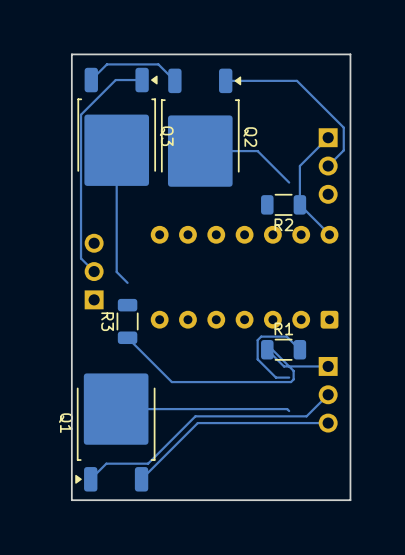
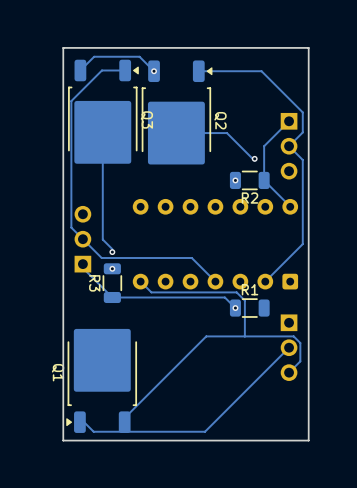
via: none -> (154, 71)
track: none -> (289, 146) (302, 159) (302, 244) (265, 281)
via: none -> (254, 158)
via: none -> (235, 180)
track: none -> (82, 239) (101, 258) (191, 258) (215, 281)
via: none -> (112, 252)
track: none -> (82, 264) (82, 268) (112, 297) (224, 297) (235, 308)
via: none -> (112, 268)
track: none -> (140, 281) (151, 292) (236, 292) (244, 300) (244, 336)
track: (127, 337) (171, 382) (291, 382) (293, 379) (293, 370) (267, 344) (267, 349) (284, 366) (328, 366) -> none
via: none -> (235, 308)
track: (299, 349) (286, 336) (261, 336) (257, 340) (257, 359) (275, 377) (289, 377) -> none
track: (116, 409) (287, 409) (289, 411) -> none
track: (306, 416) (195, 416) (148, 463) (106, 463) (90, 479) -> (270, 366) (205, 431) (93, 431) (79, 417)
track: (328, 423) (197, 423) (141, 479) -> (289, 372) (300, 361) (300, 343) (293, 336) (206, 336) (124, 417)

